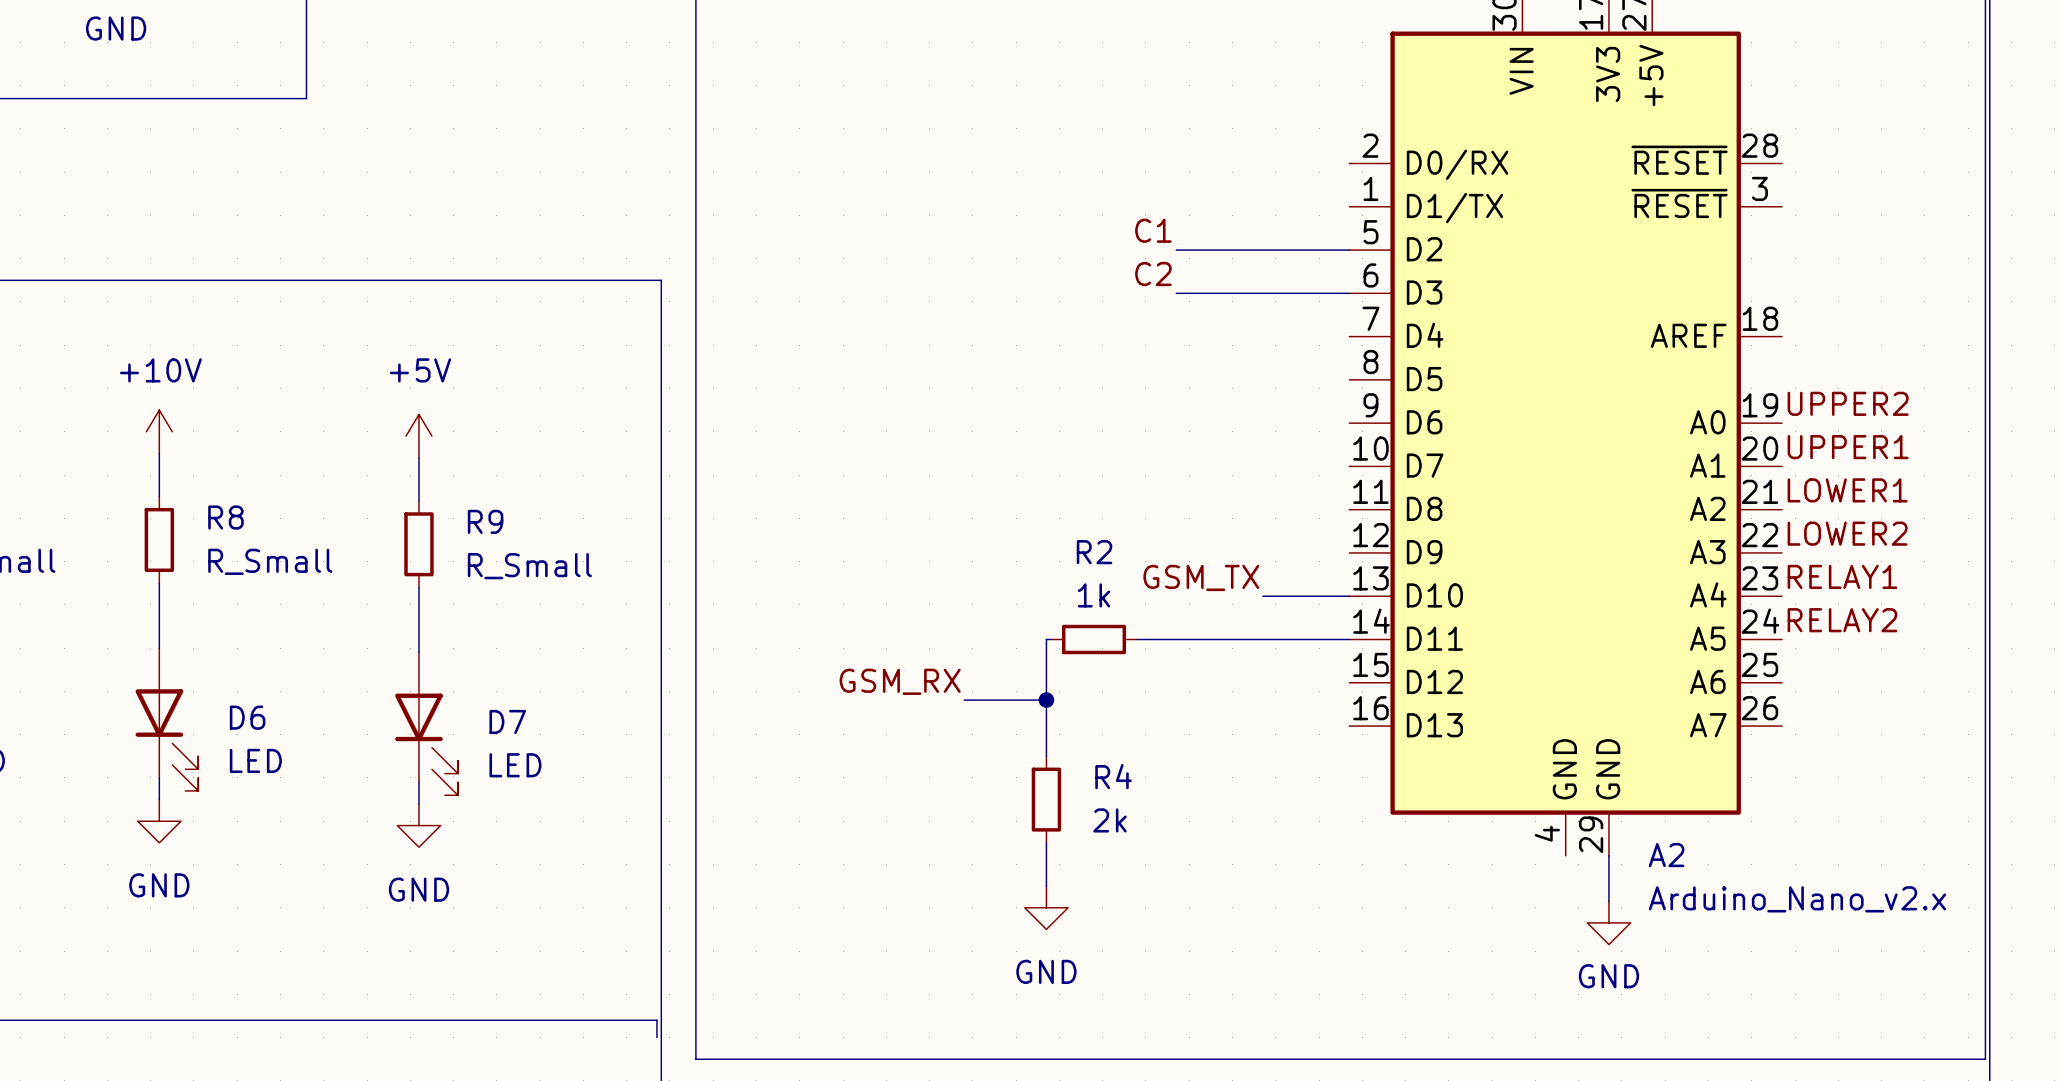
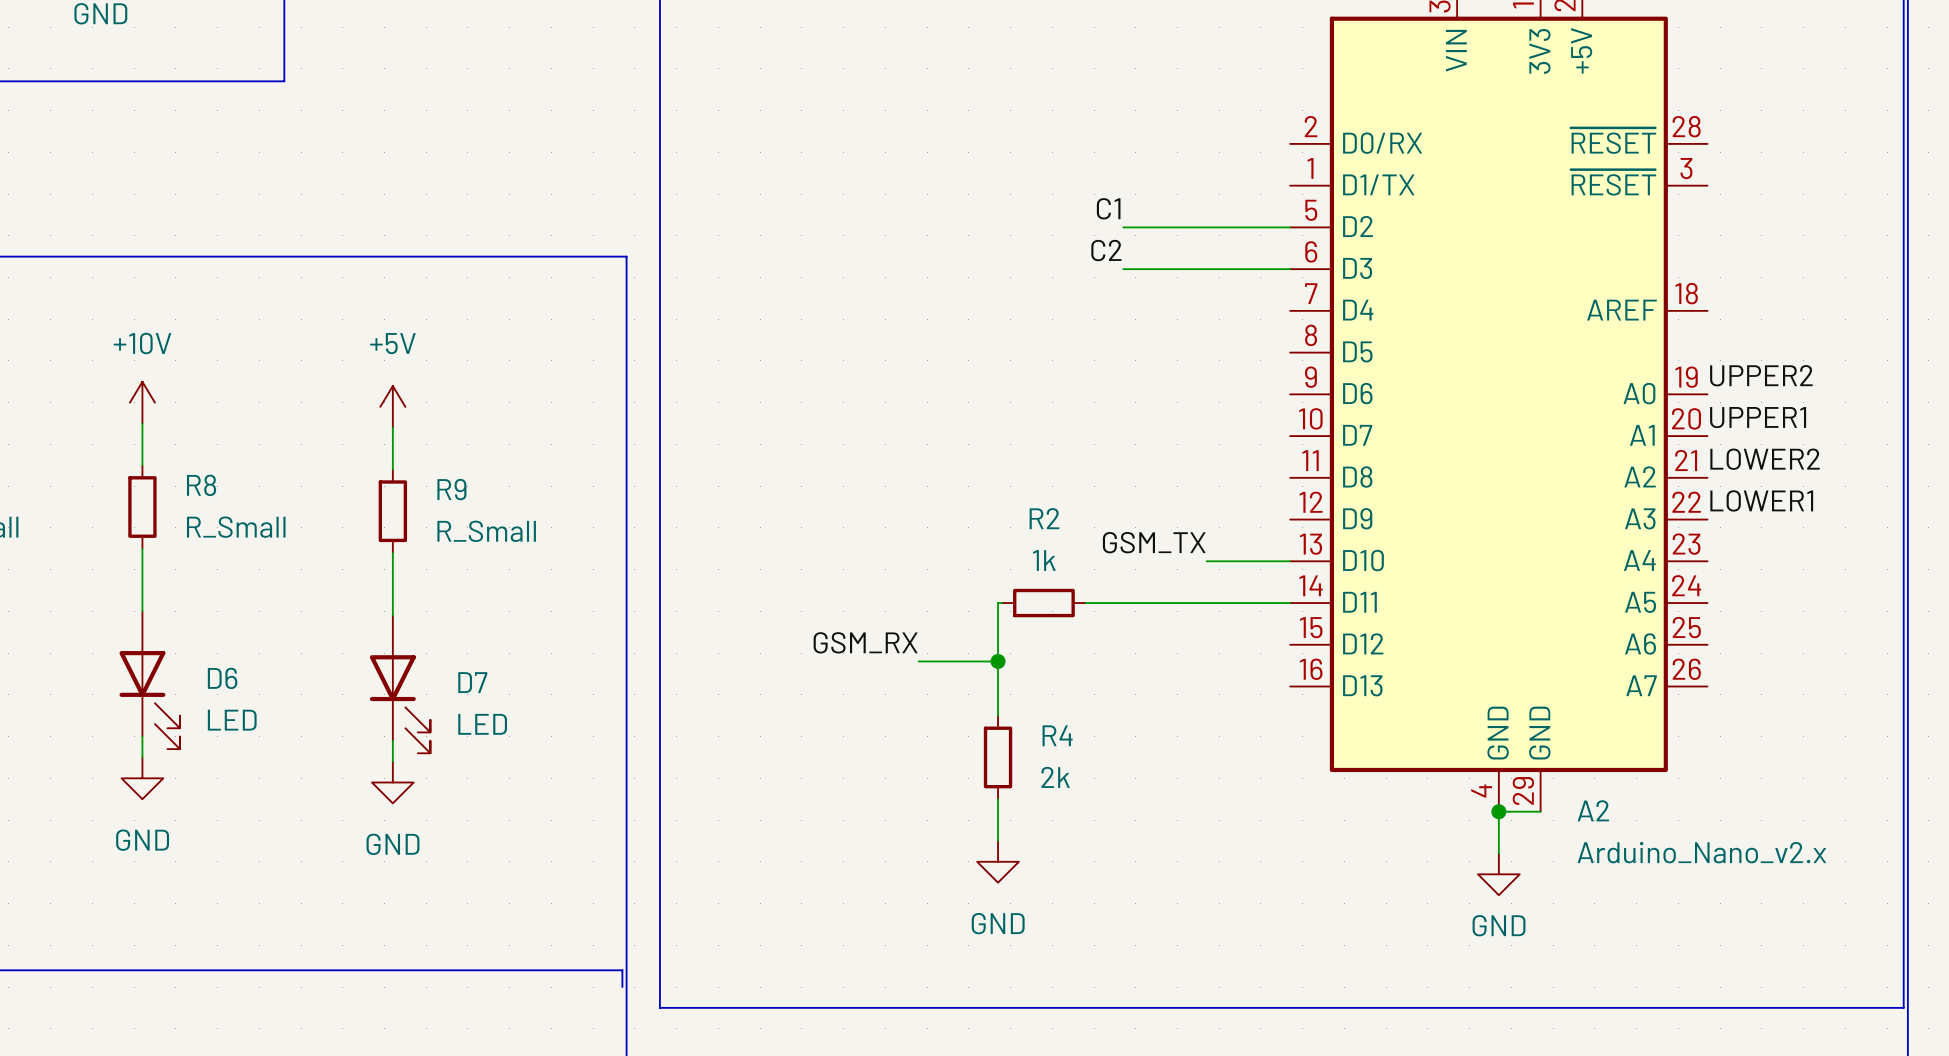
label: LOWER1 (1847, 490) -> LOWER2 (1765, 459)
label: LOWER2 (1847, 533) -> LOWER1 (1761, 500)
label: RELAY1 (1842, 576) -> none
label: RELAY2 (1842, 620) -> none
junction: none -> (1498, 811)
wire: (1608, 855) (1608, 901) -> (1540, 811) (1498, 811) (1498, 853)
power symbol position: GND (1608, 922) -> GND (1498, 874)

